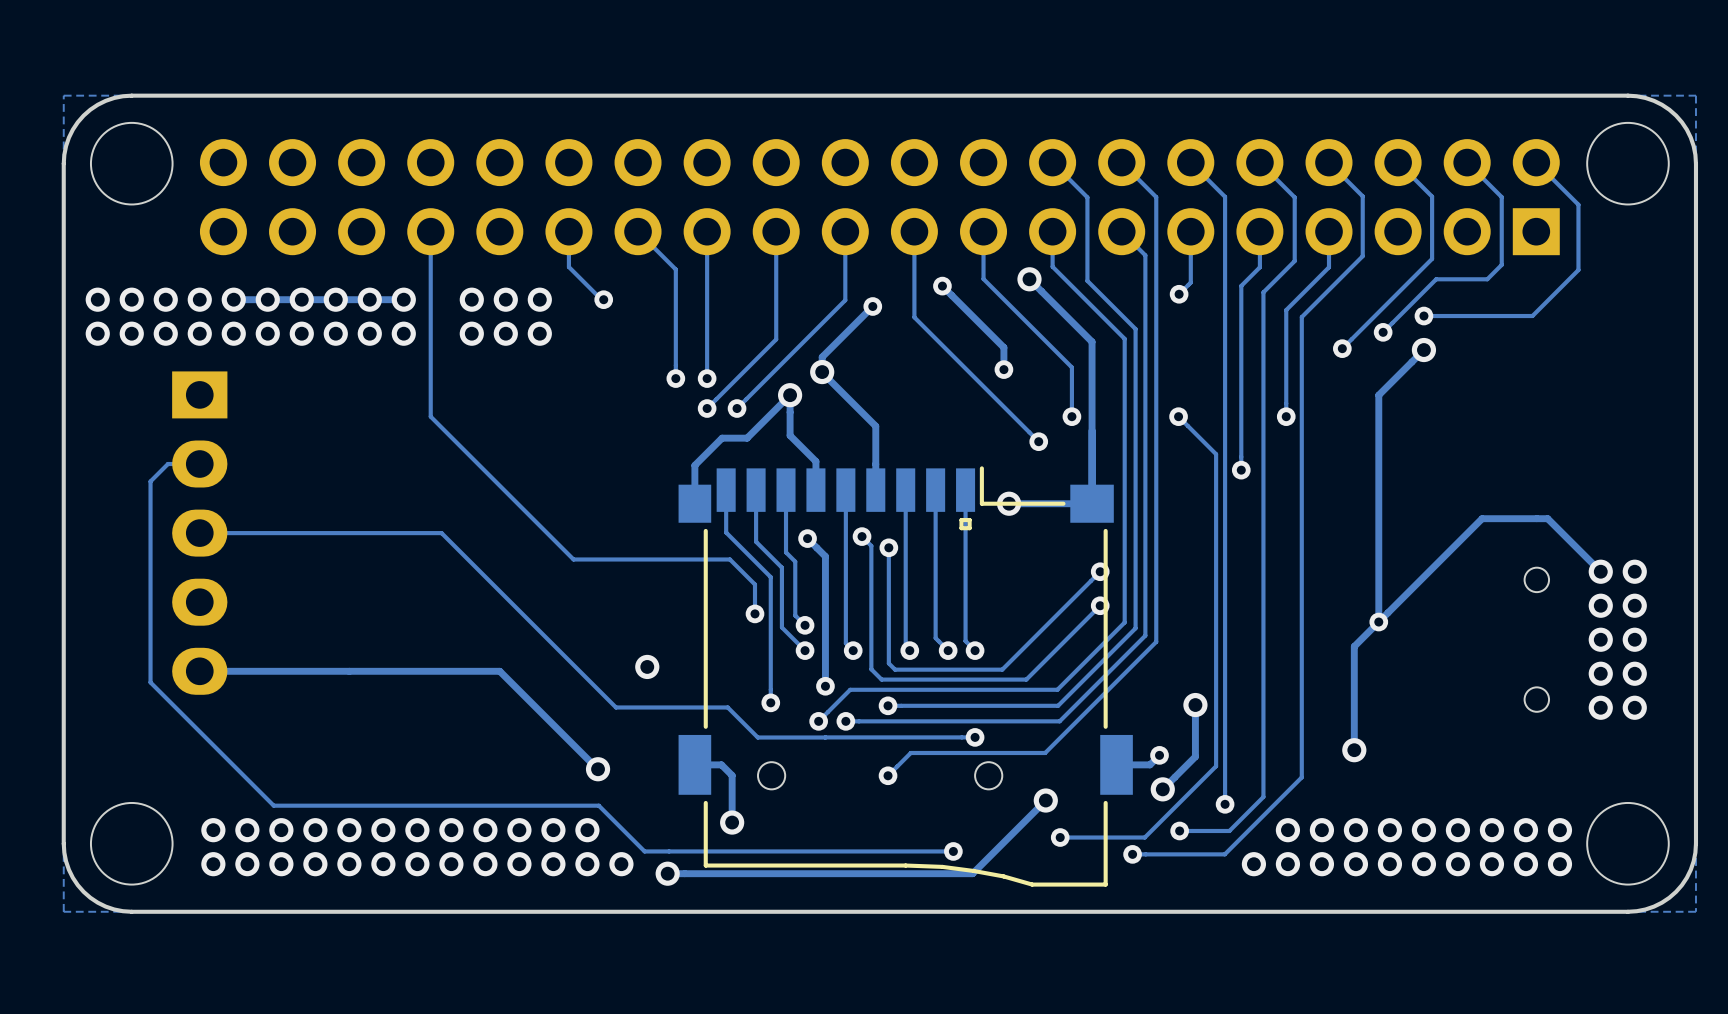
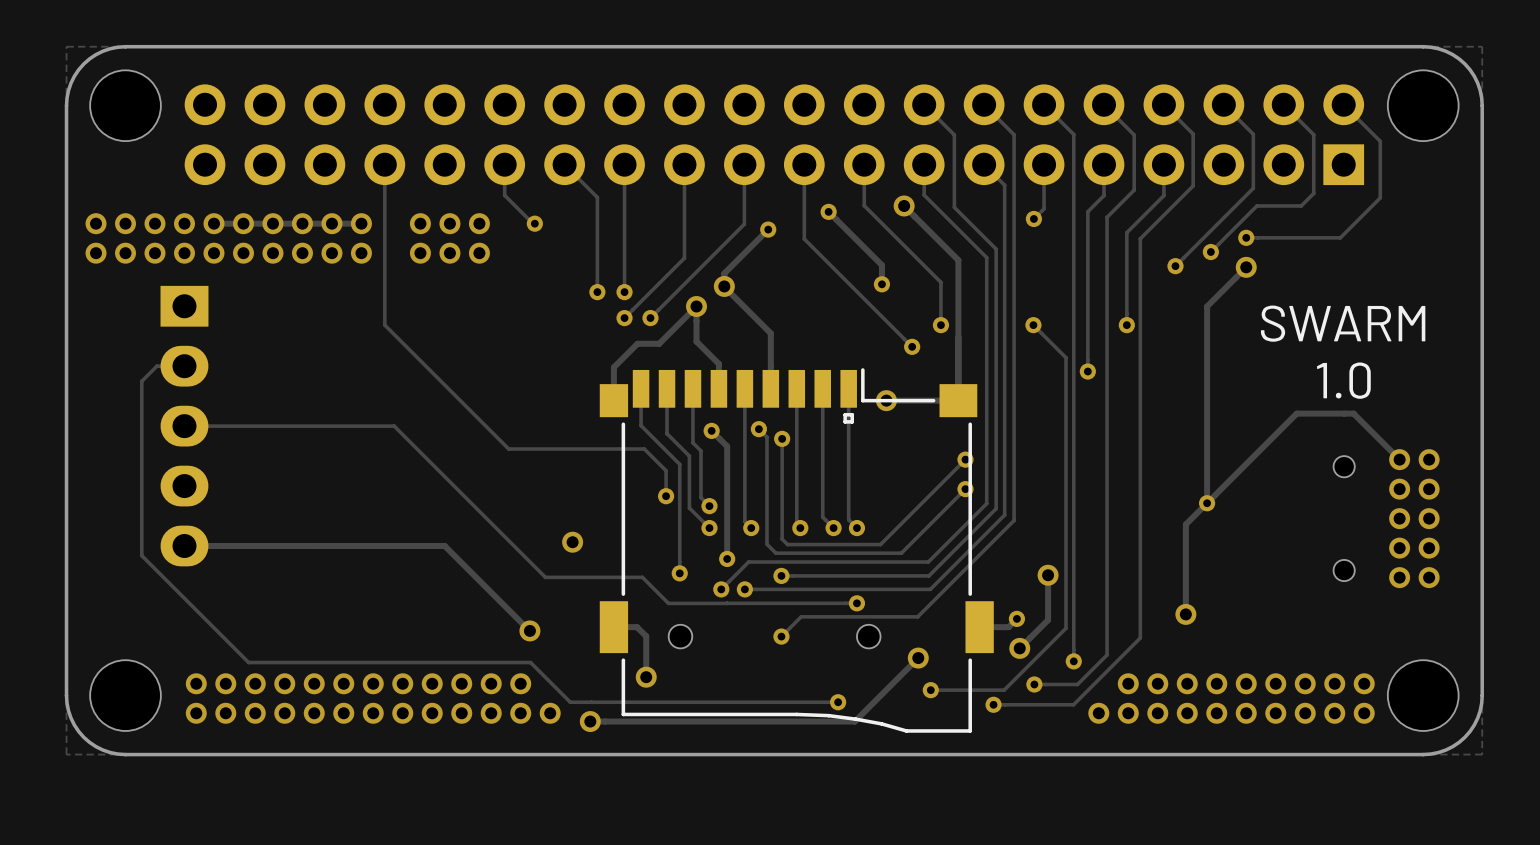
text: none -> SWARM (1343, 323)
text: none -> 1.0 (1343, 380)

